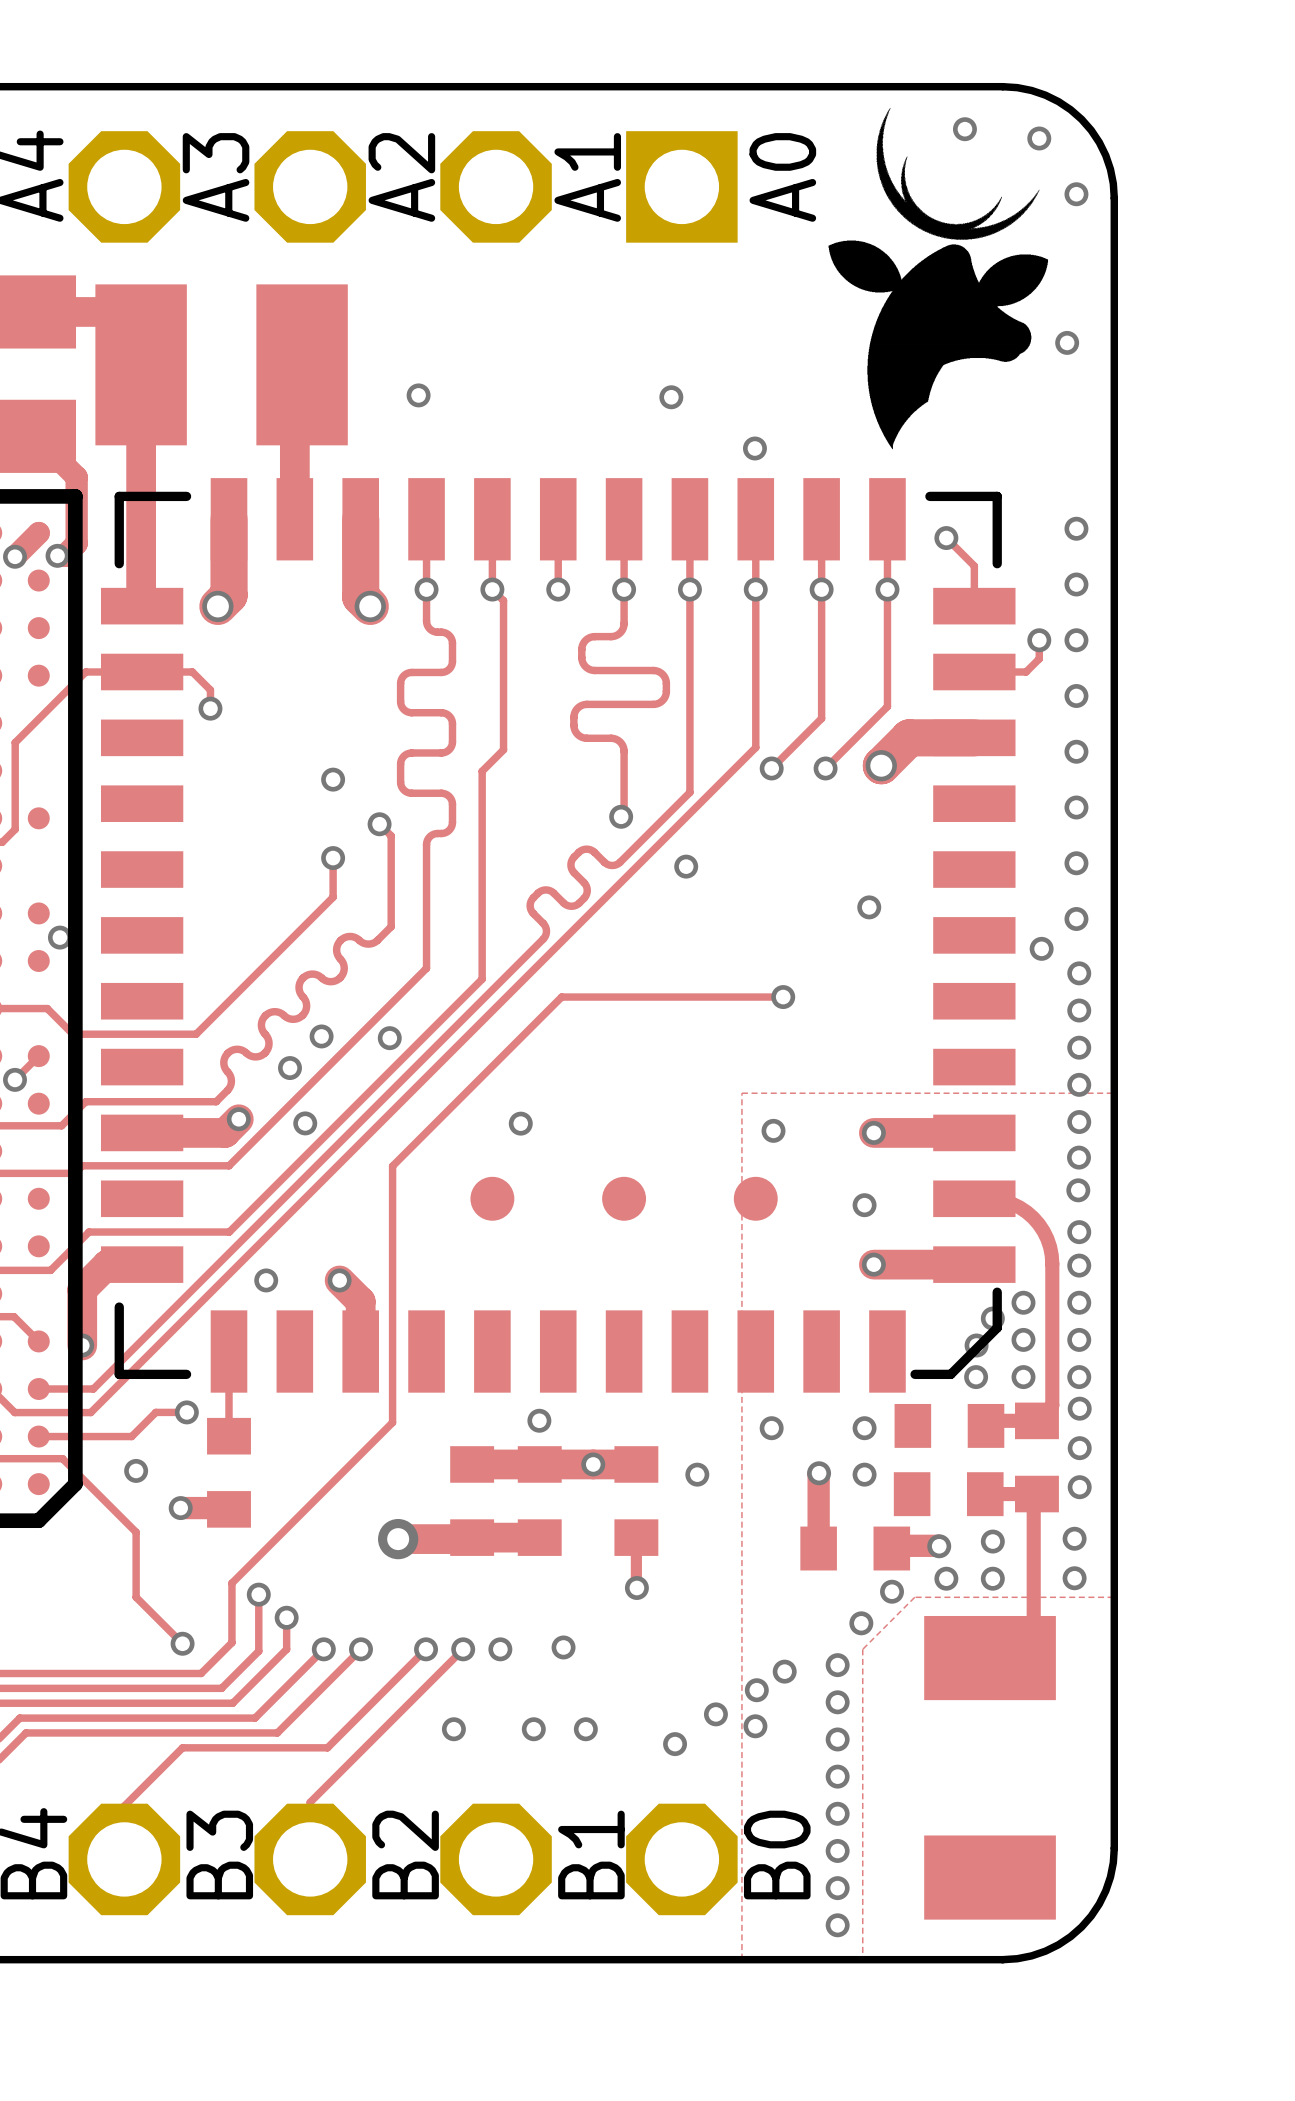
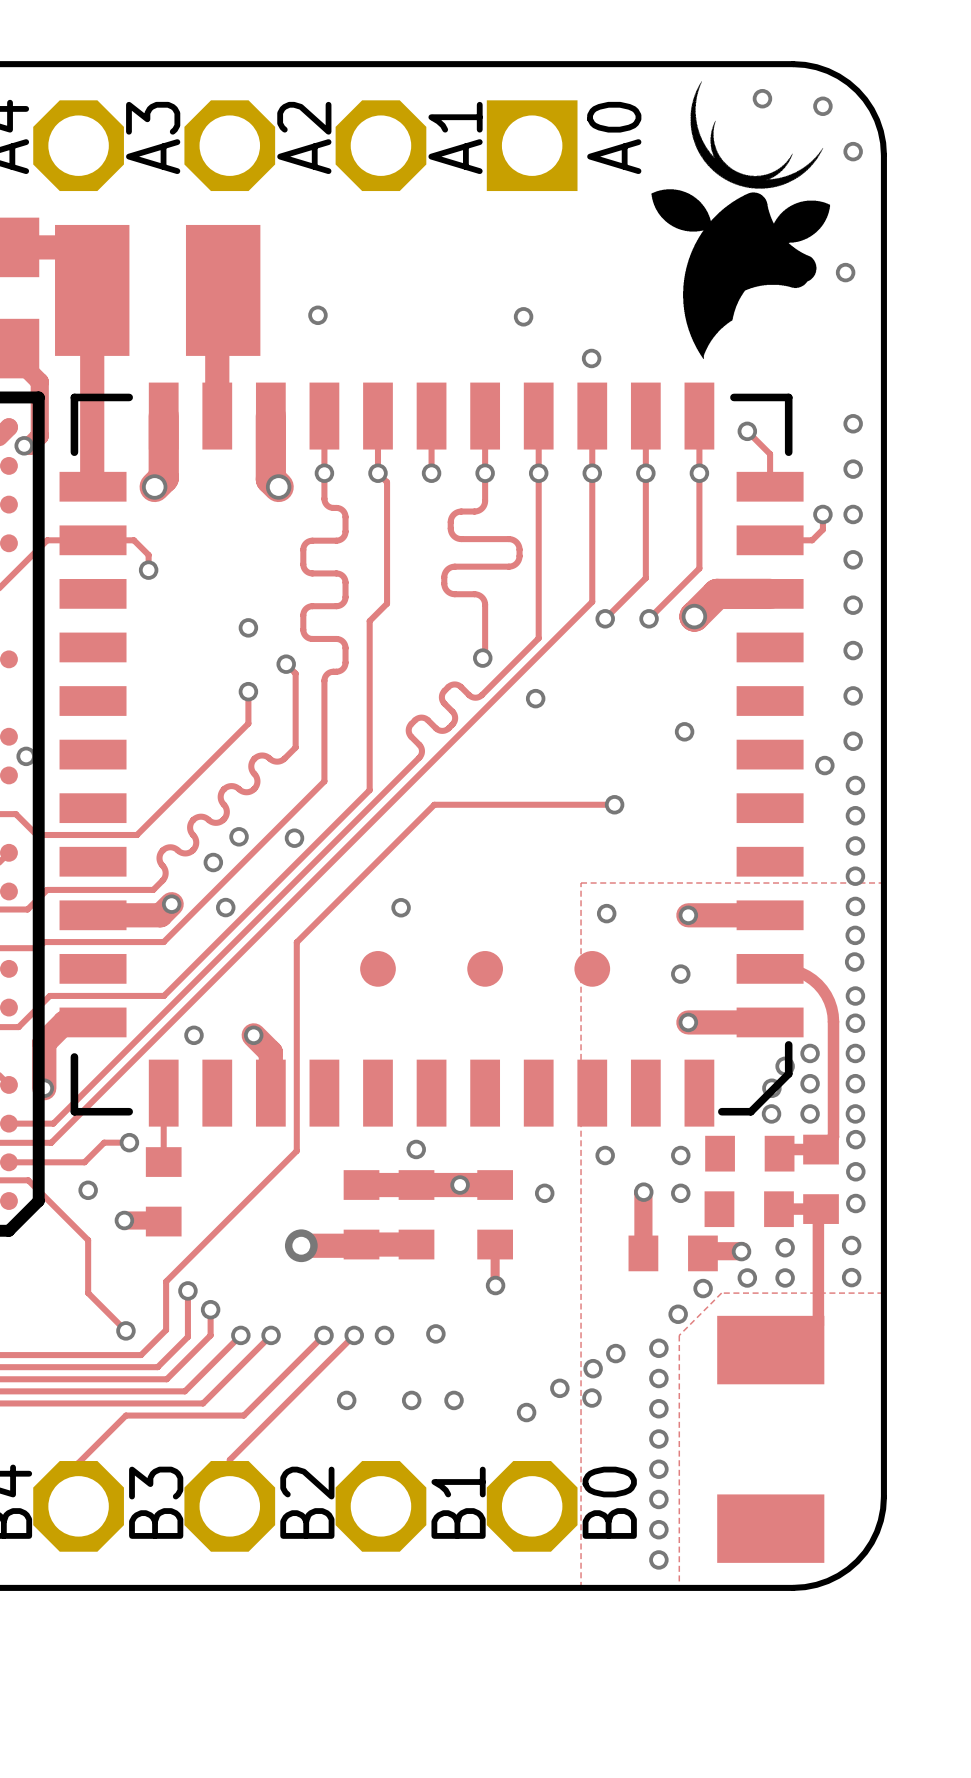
part position: (990, 1767) -> (770, 1439)

